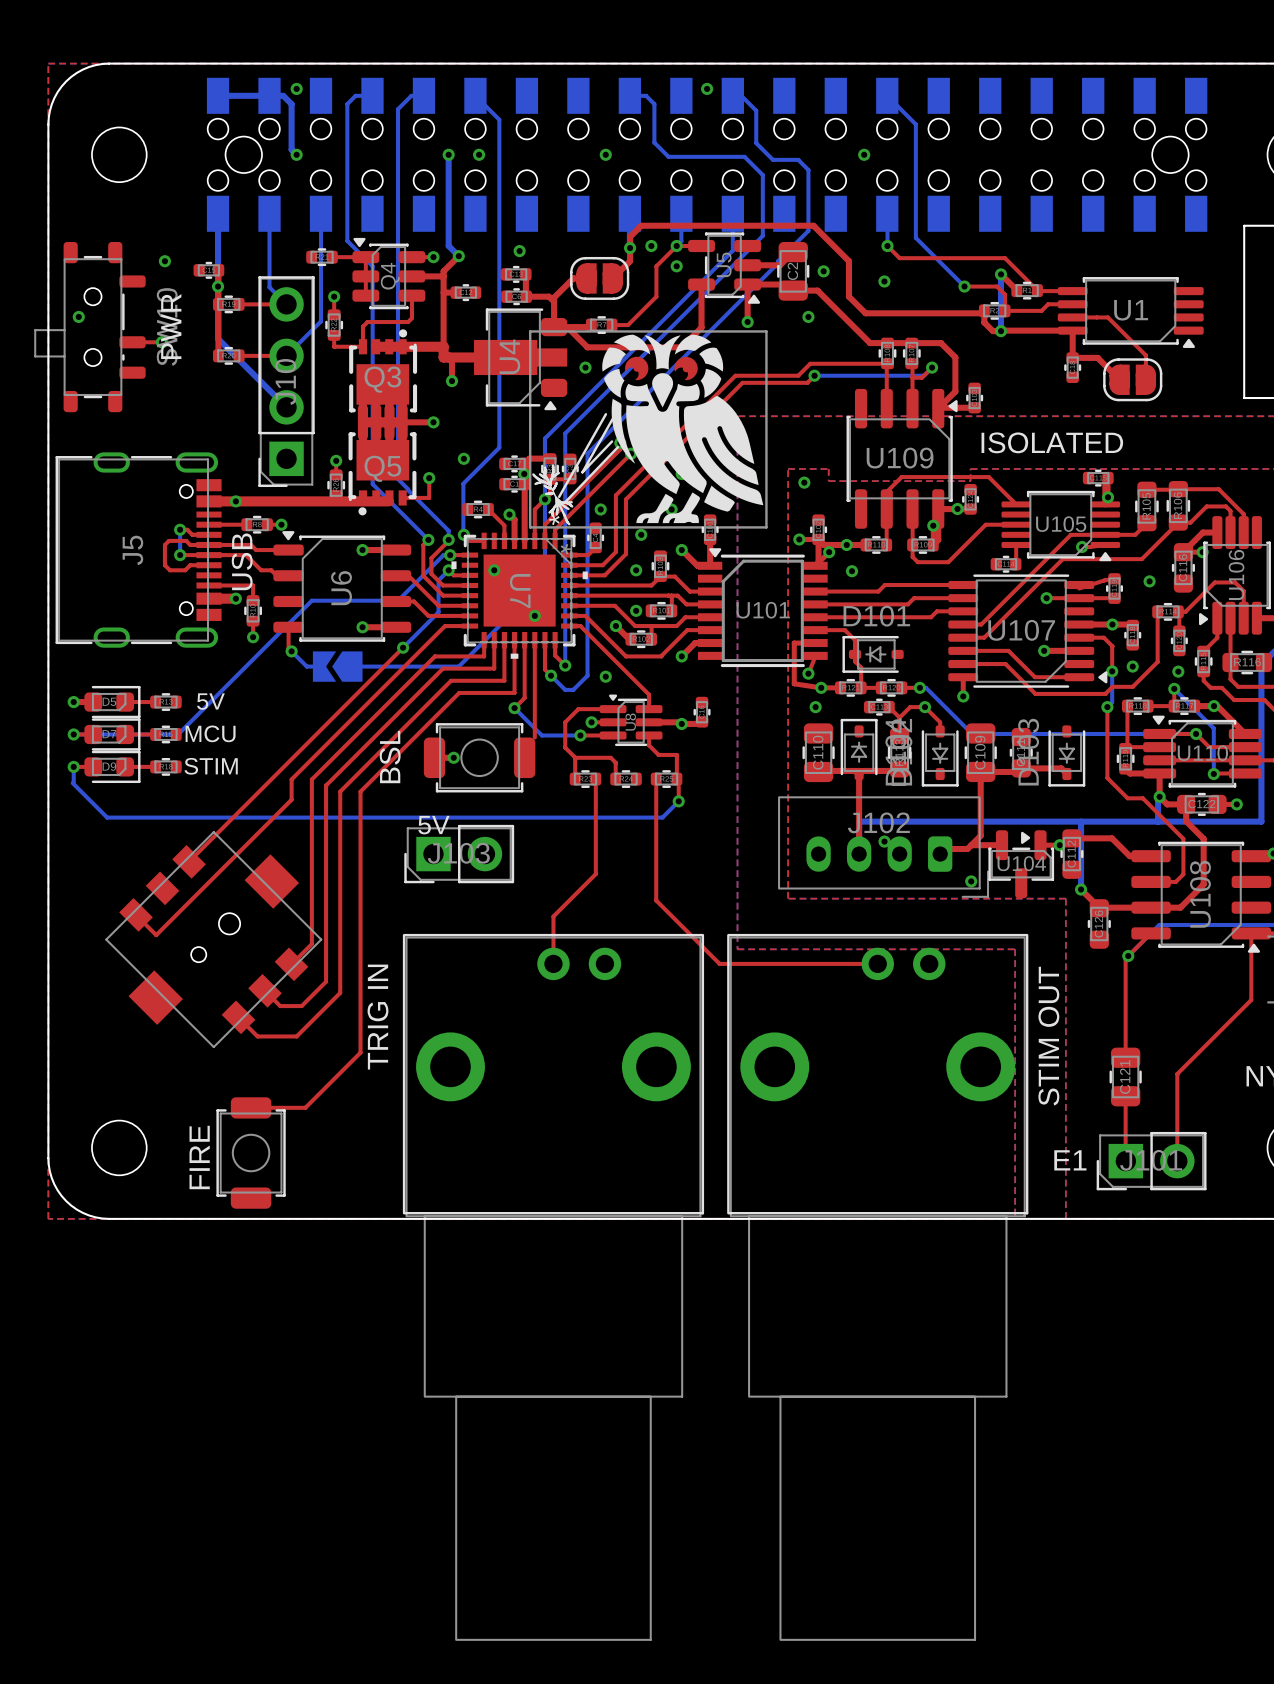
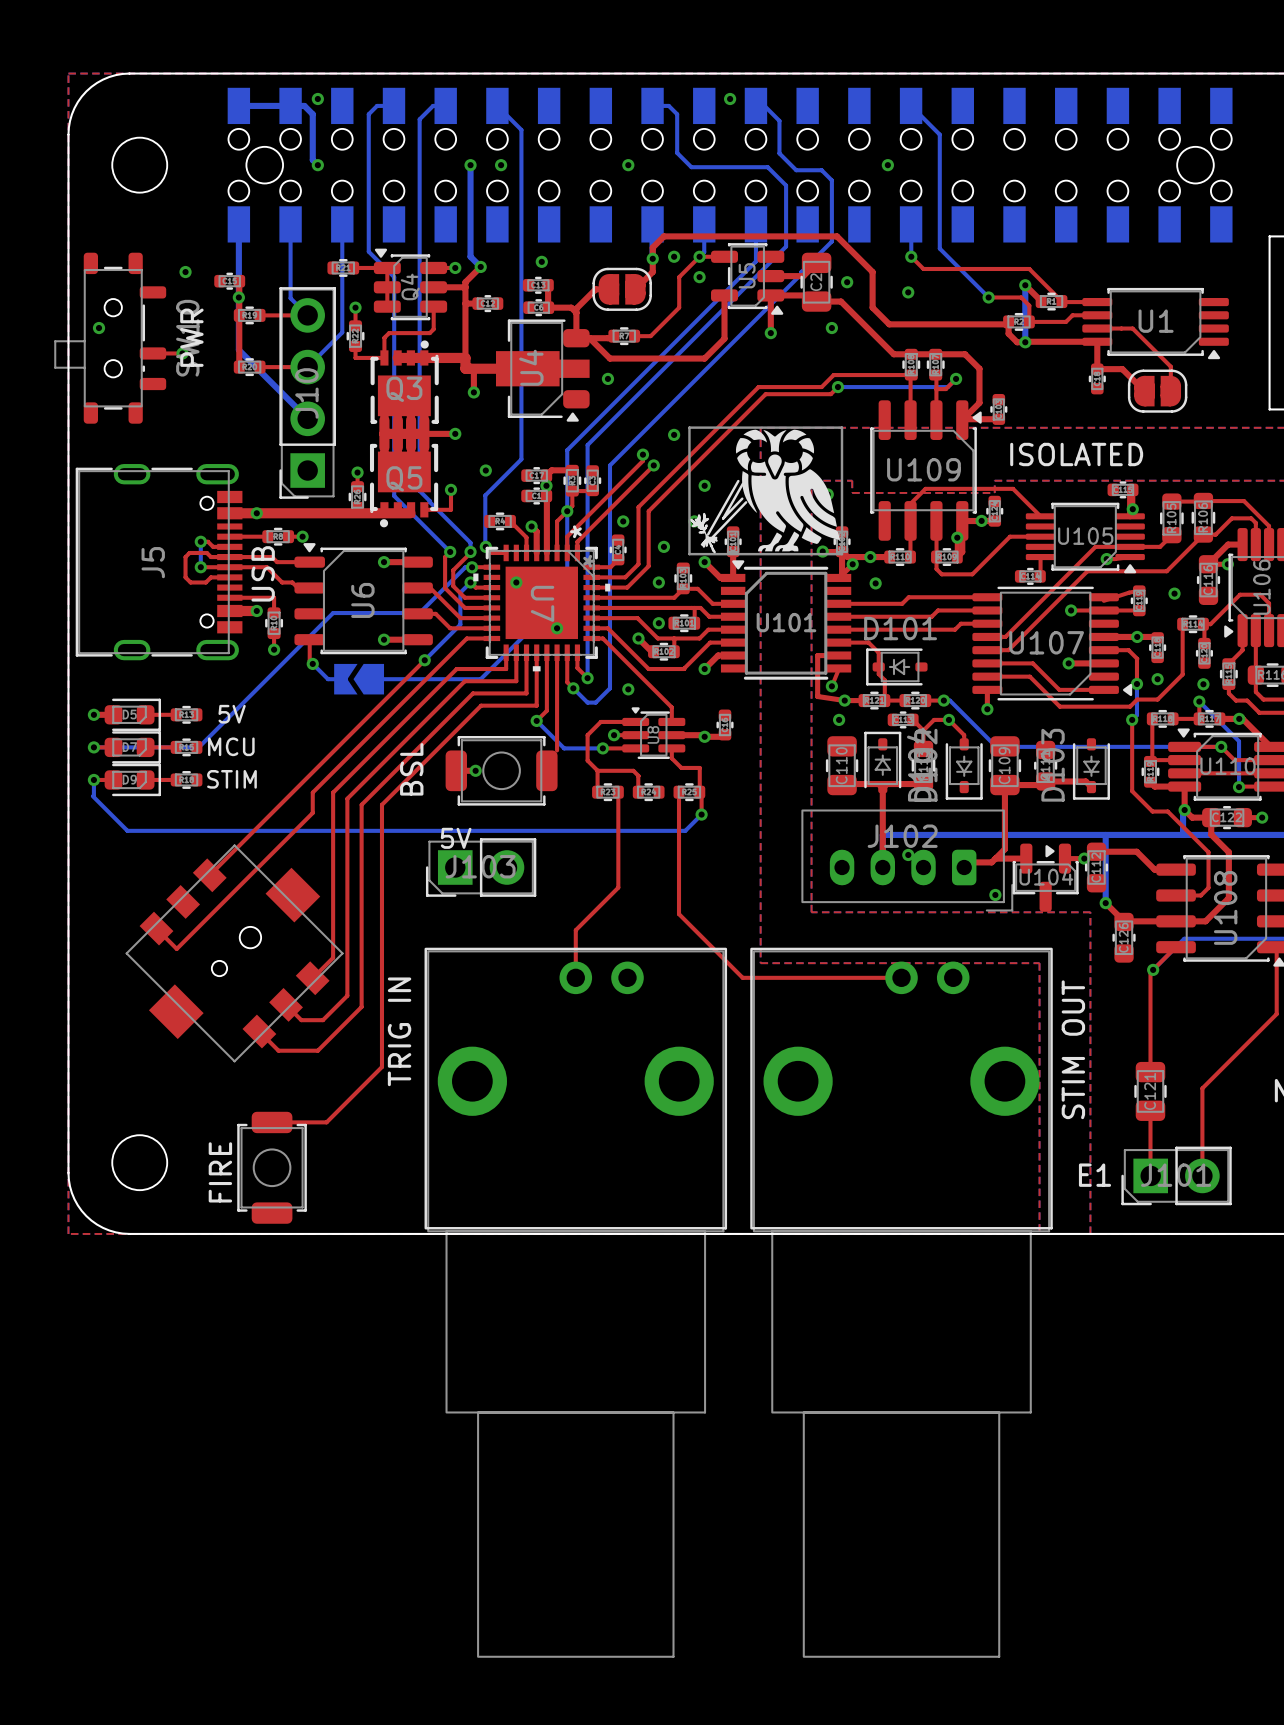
drawing: none -> [688, 426, 844, 556]
part: (648, 429) -> none

